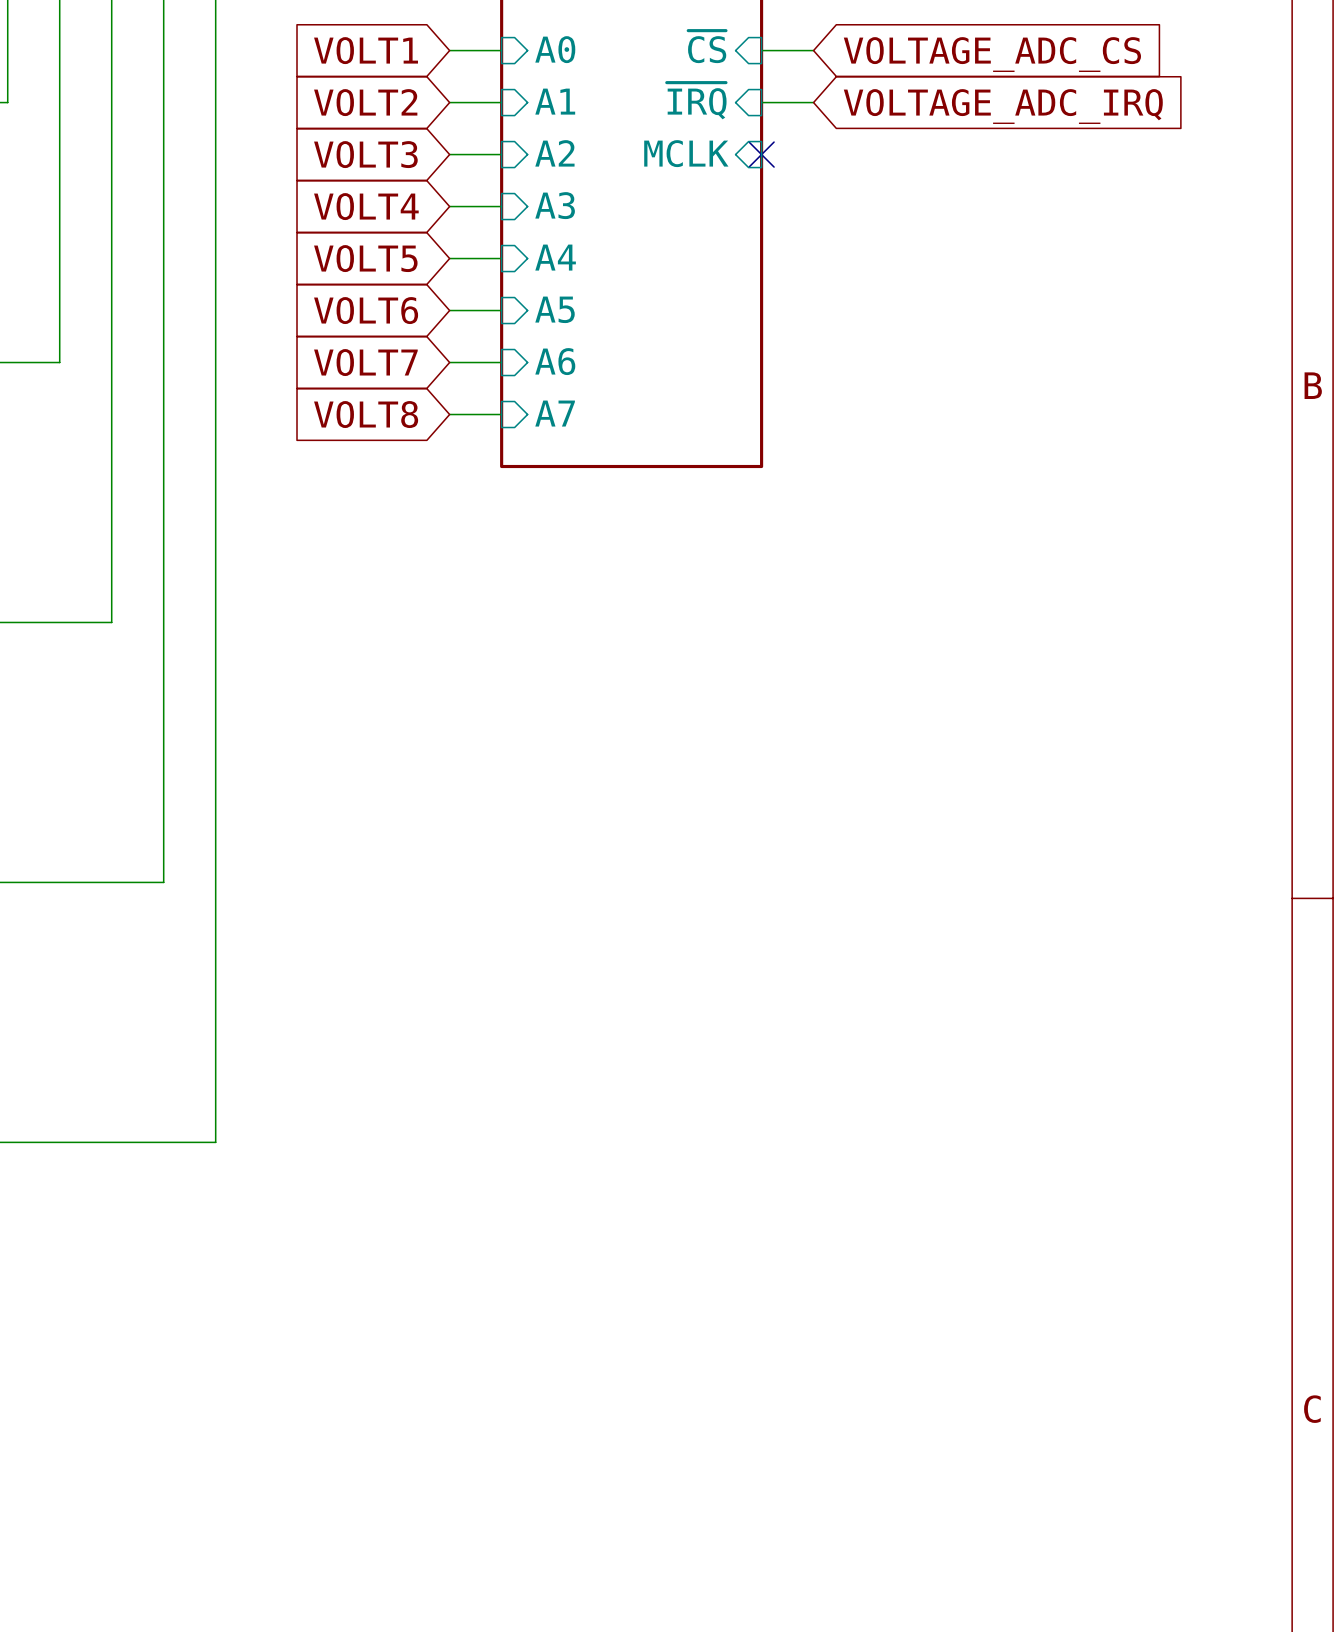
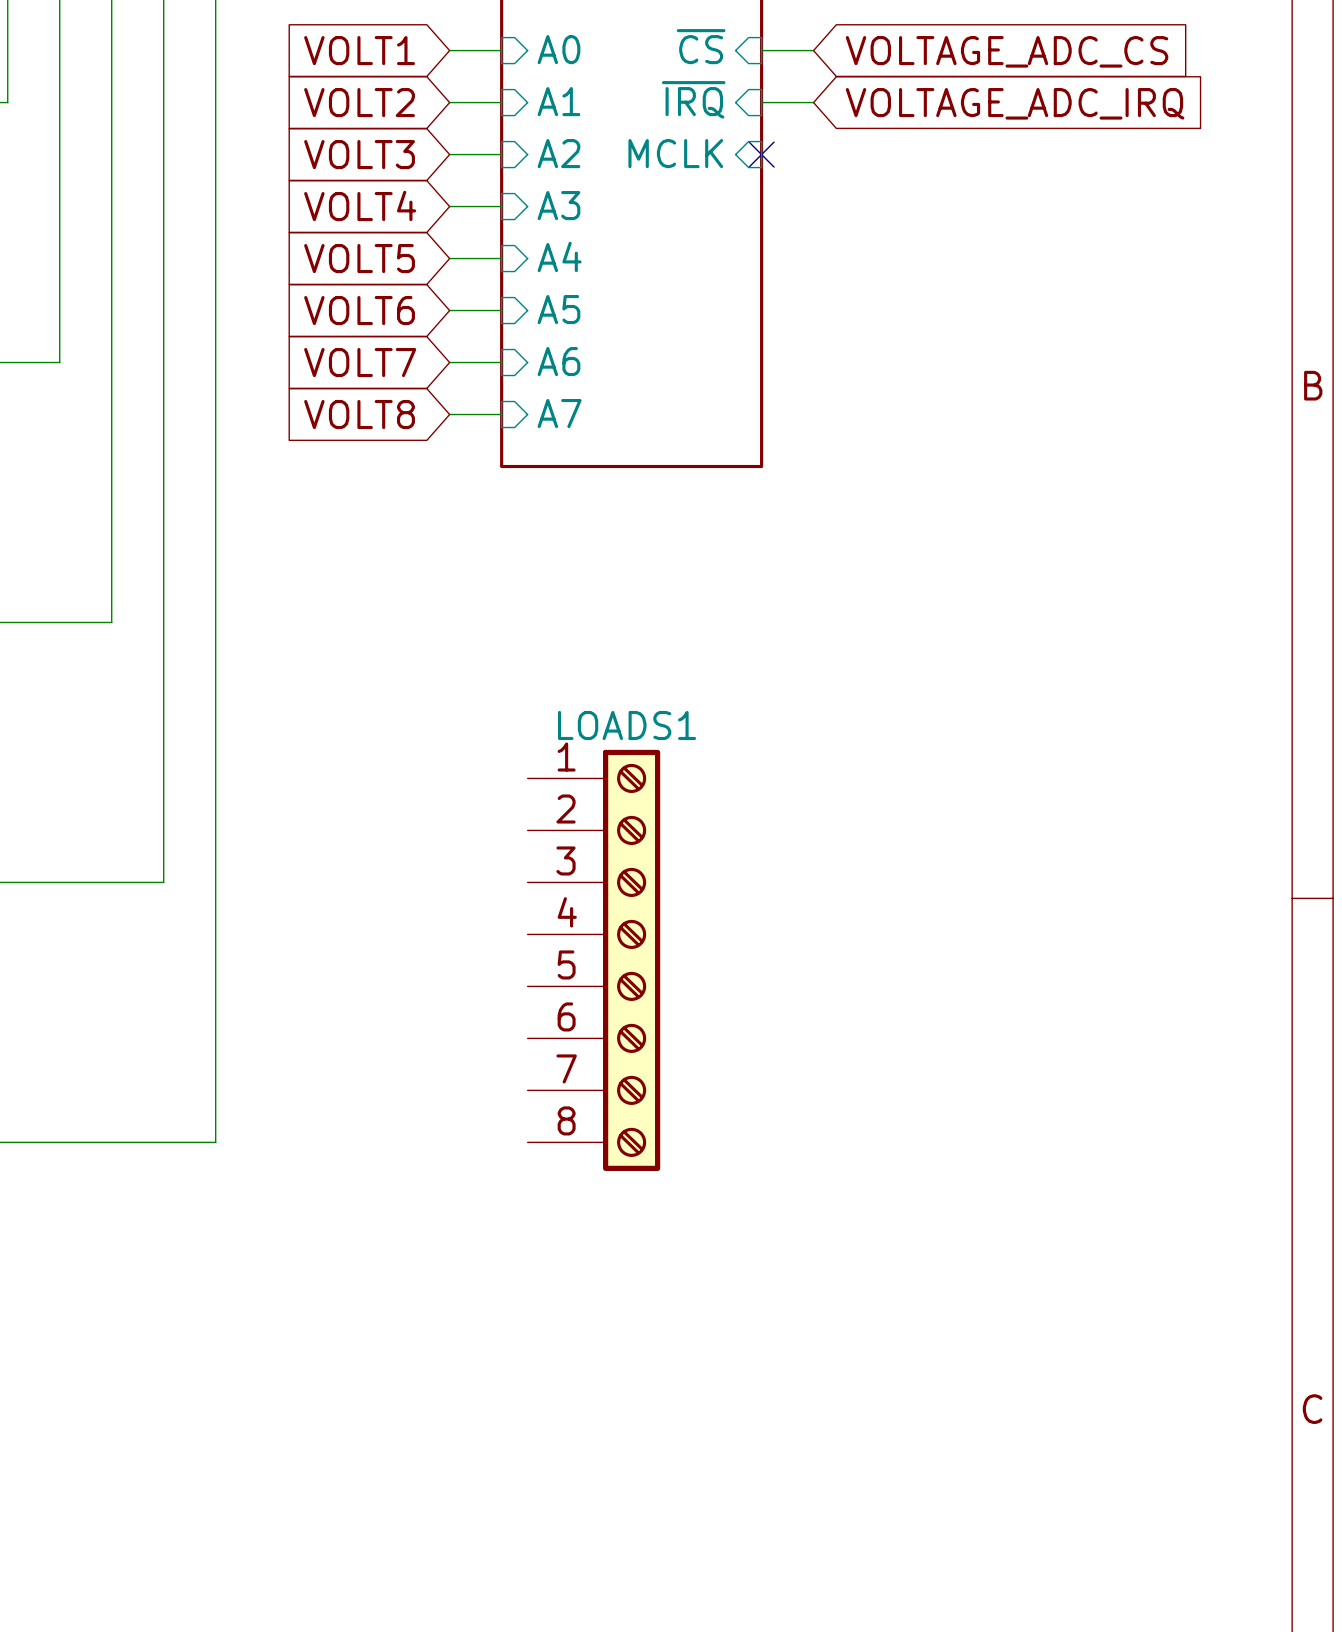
LOADS1: none -> (593, 960)

